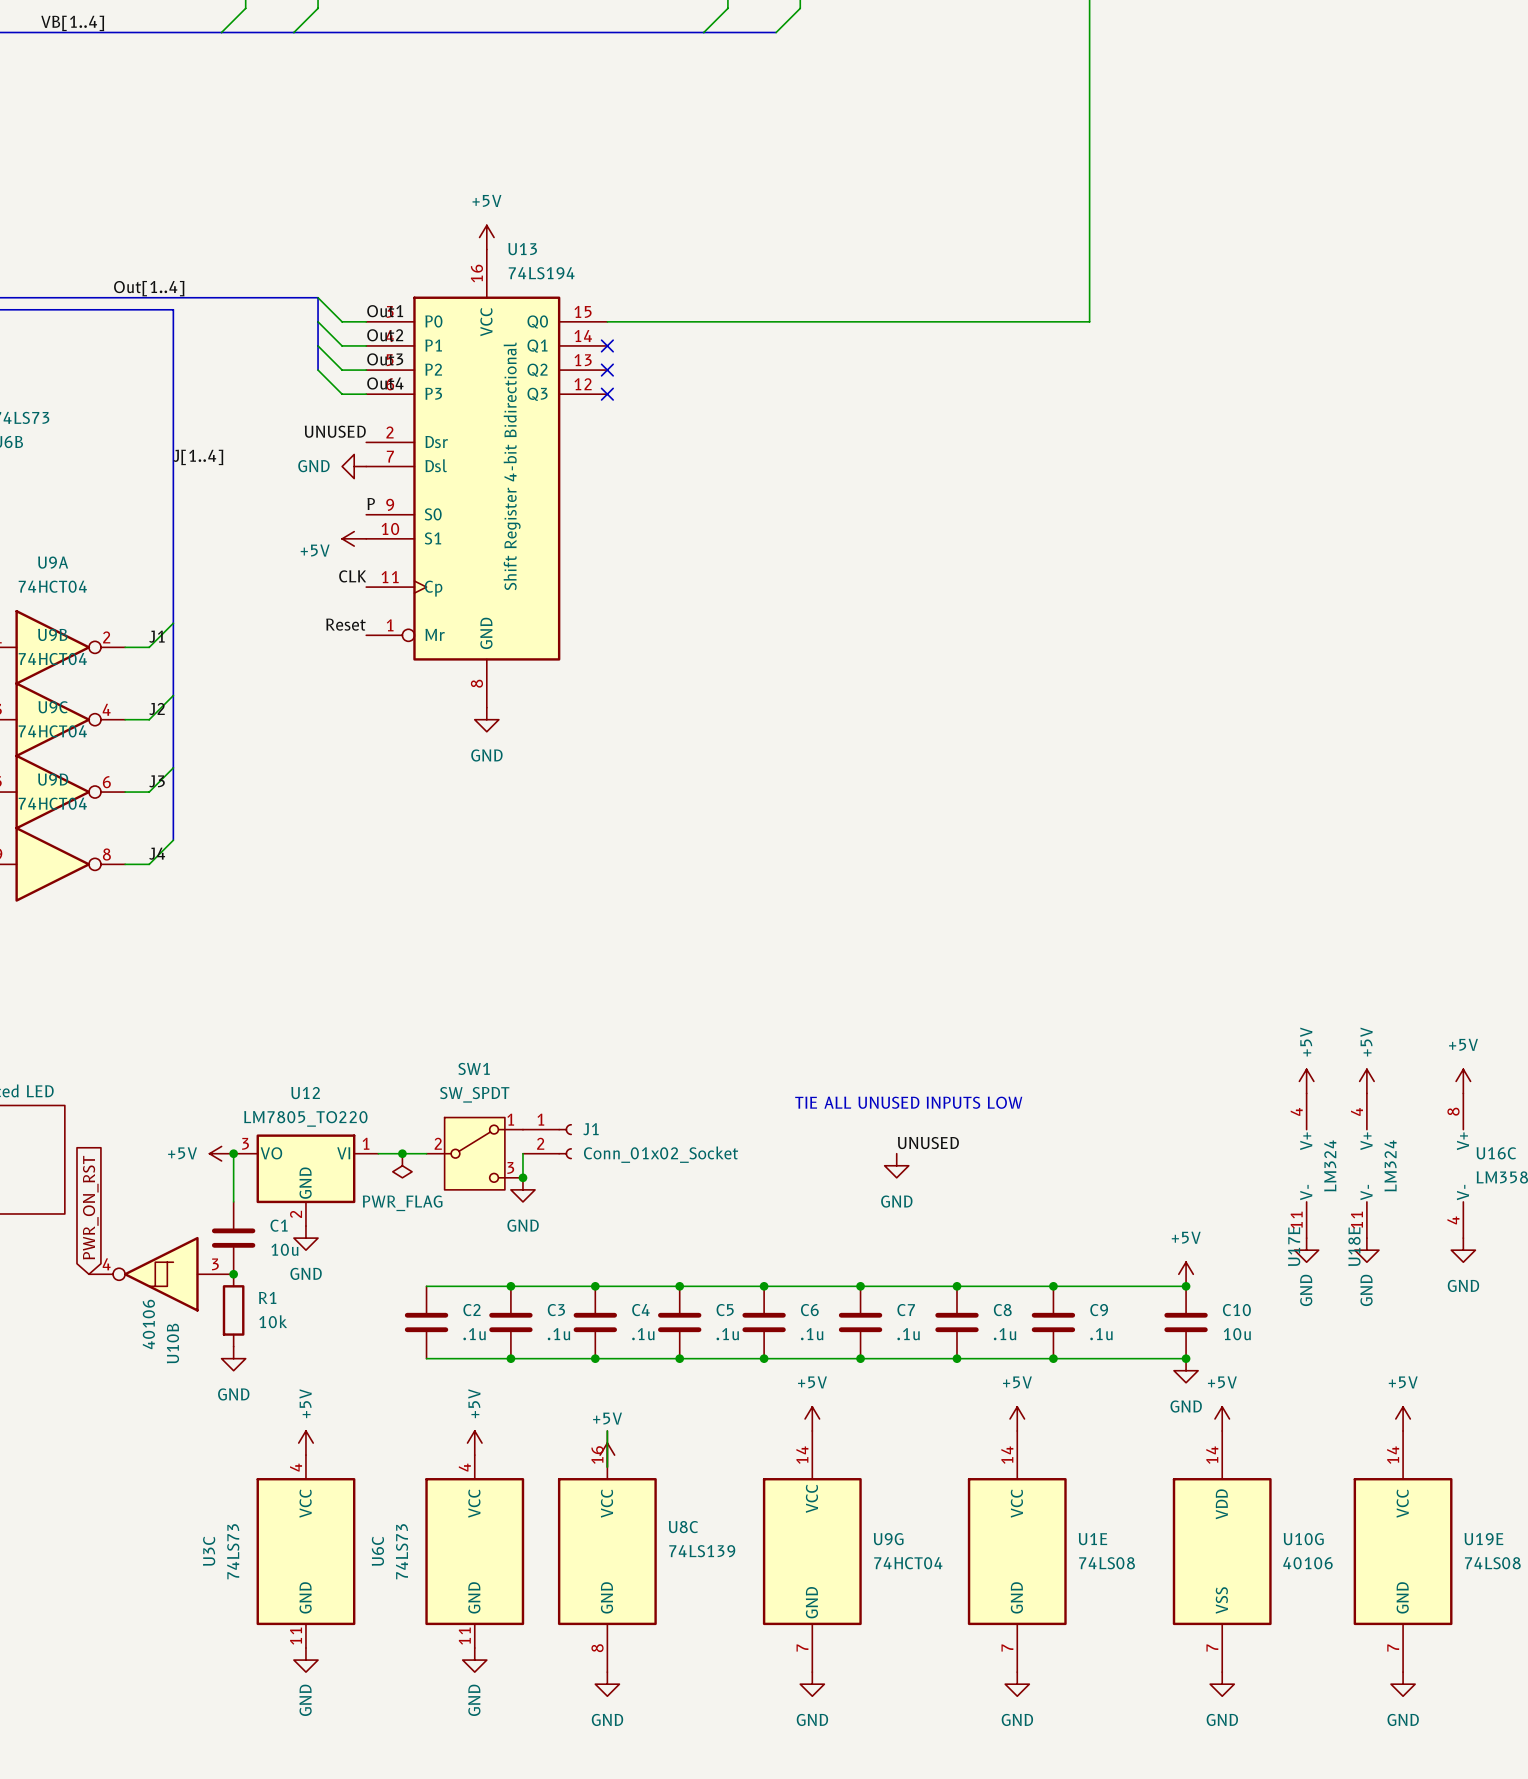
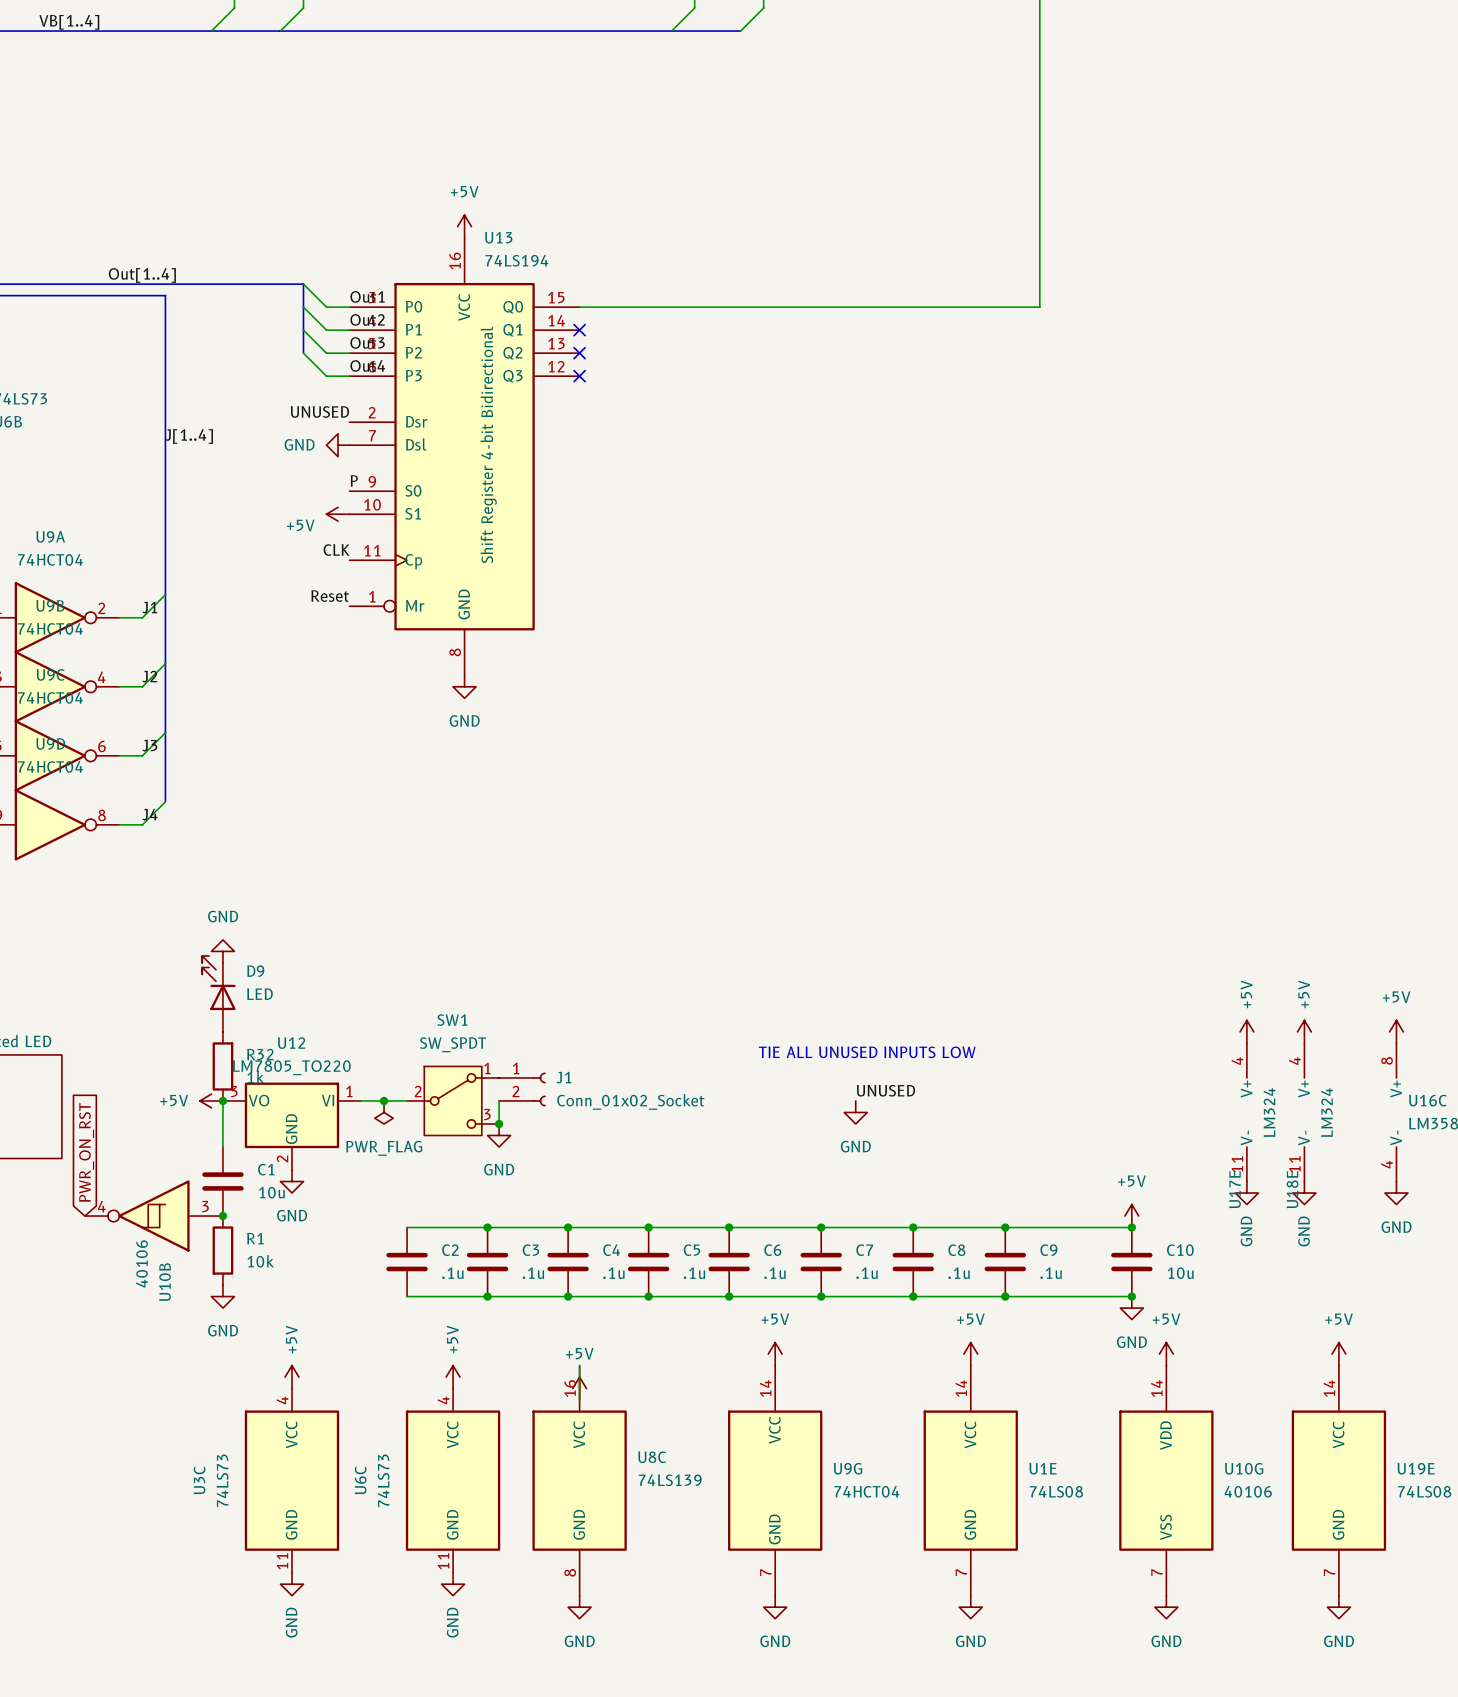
power symbol: none -> GND (222, 951)
D9: none -> LED (218, 993)
R32: none -> 1k (222, 1066)

